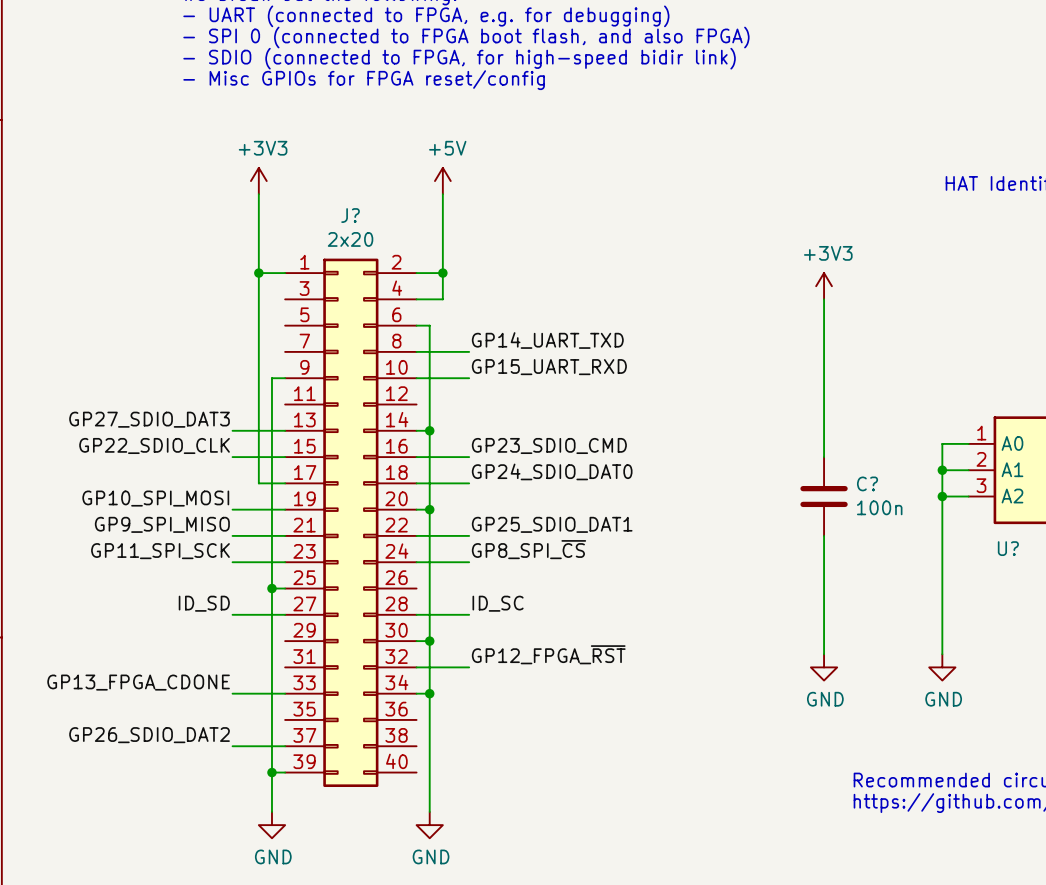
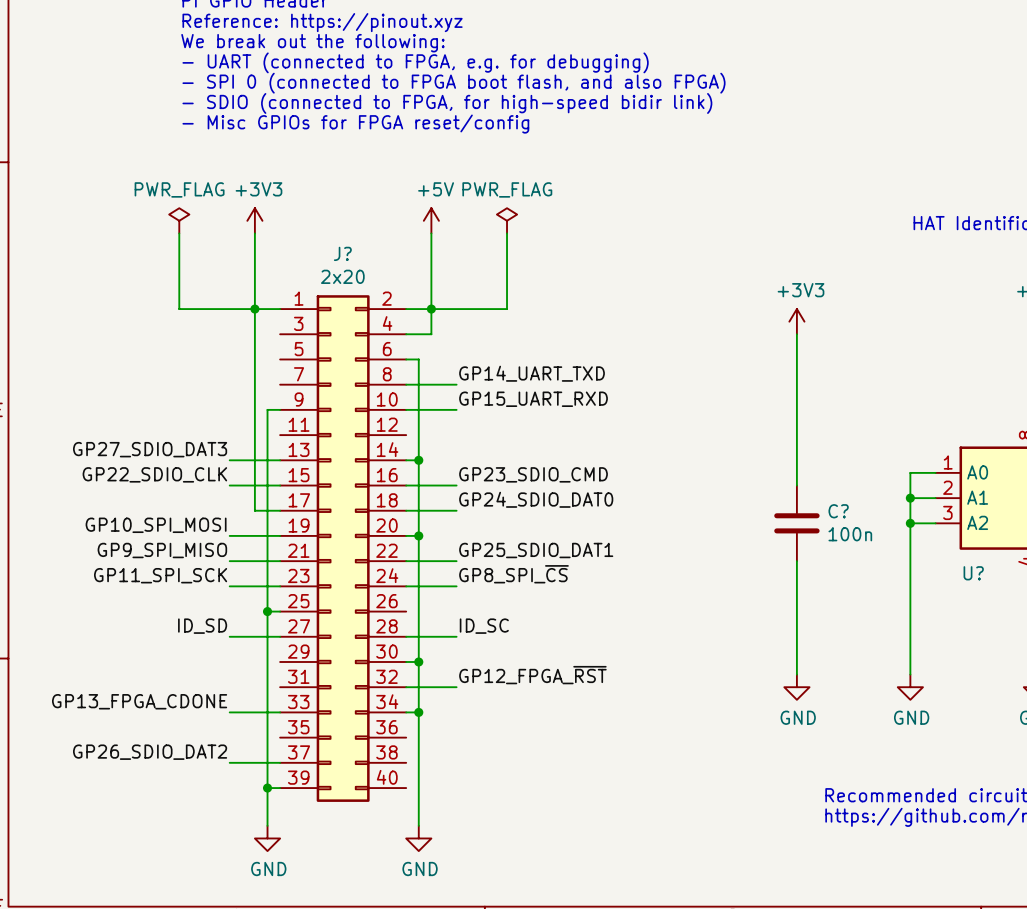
power symbol: none -> PWR_FLAG (179, 220)
power symbol: none -> PWR_FLAG (507, 220)
wire: none -> (179, 233) (179, 309) (254, 309)
wire: none -> (507, 233) (507, 309) (431, 309)

